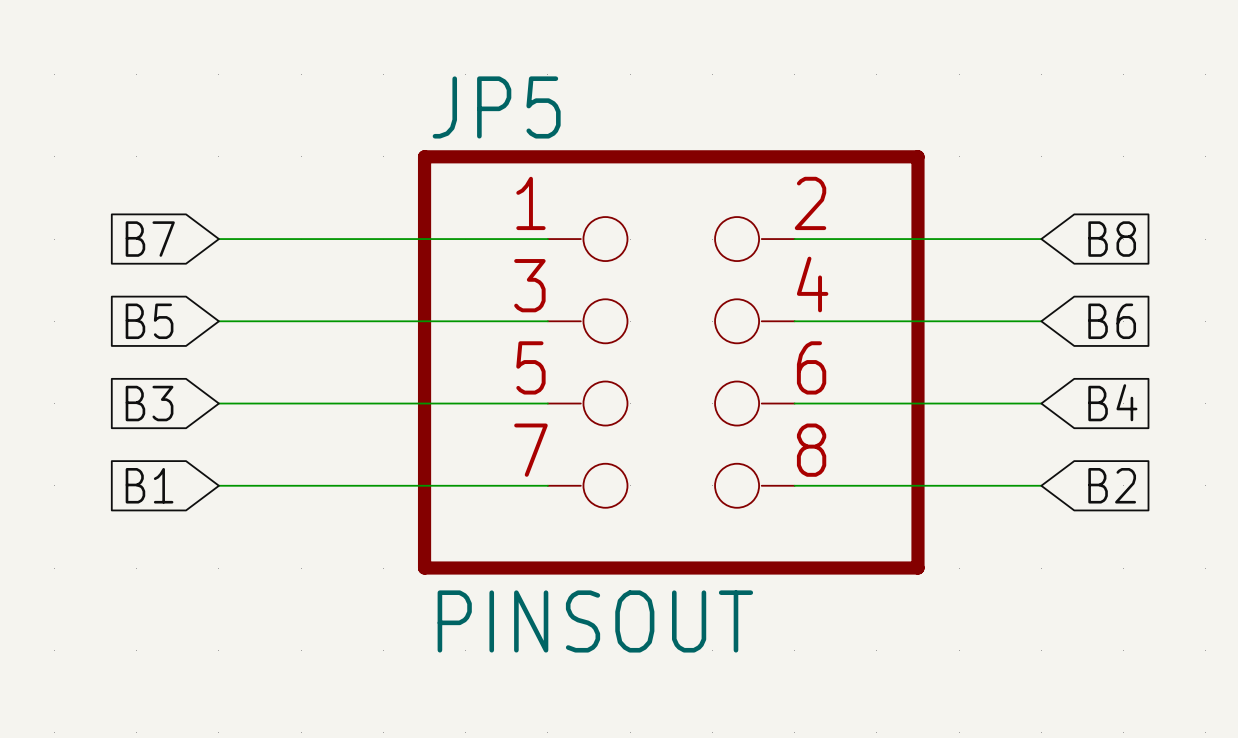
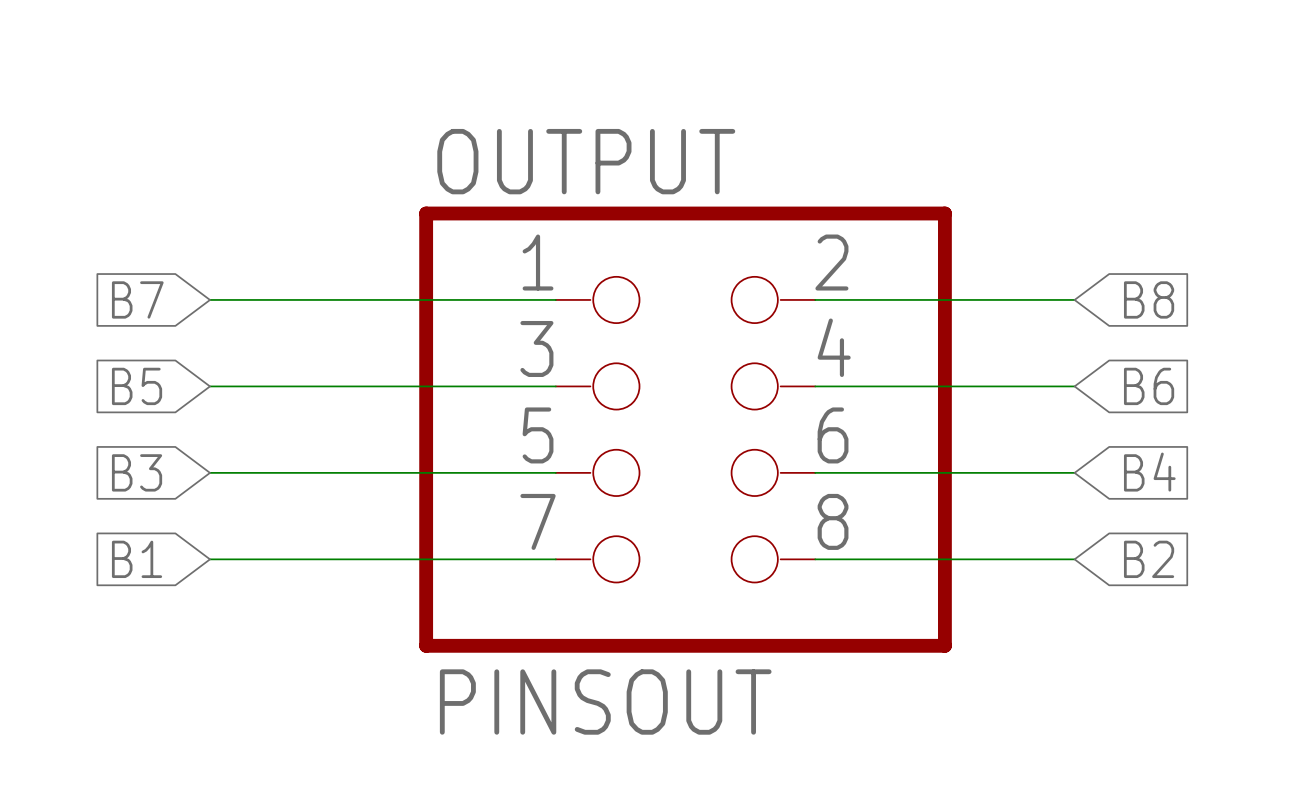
JP5 name: JP5 (496, 107) -> OUTPUT (586, 161)

